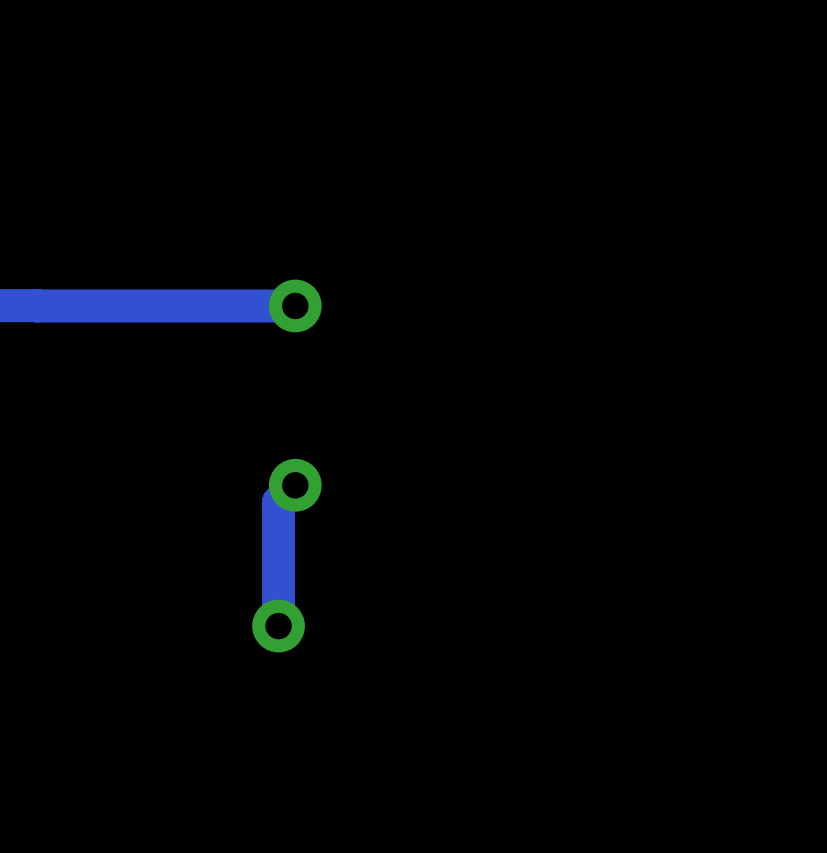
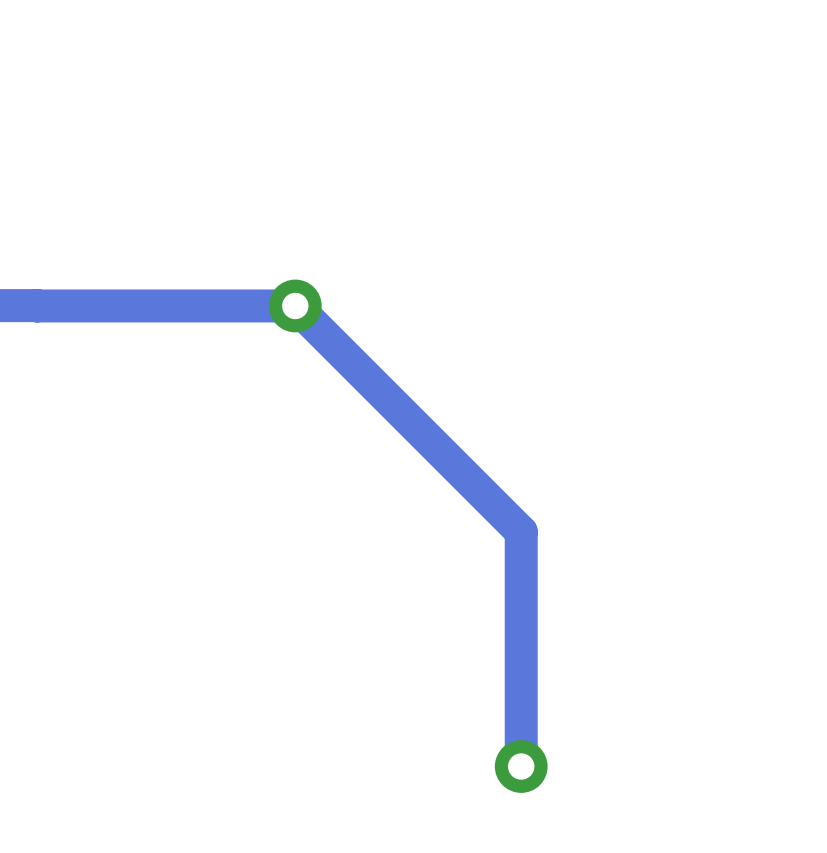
track: none -> (295, 305) (521, 531) (521, 766)
track: (295, 485) (278, 502) (278, 626) -> none
via: (295, 485) -> none
via: (278, 626) -> none
via: none -> (521, 766)

